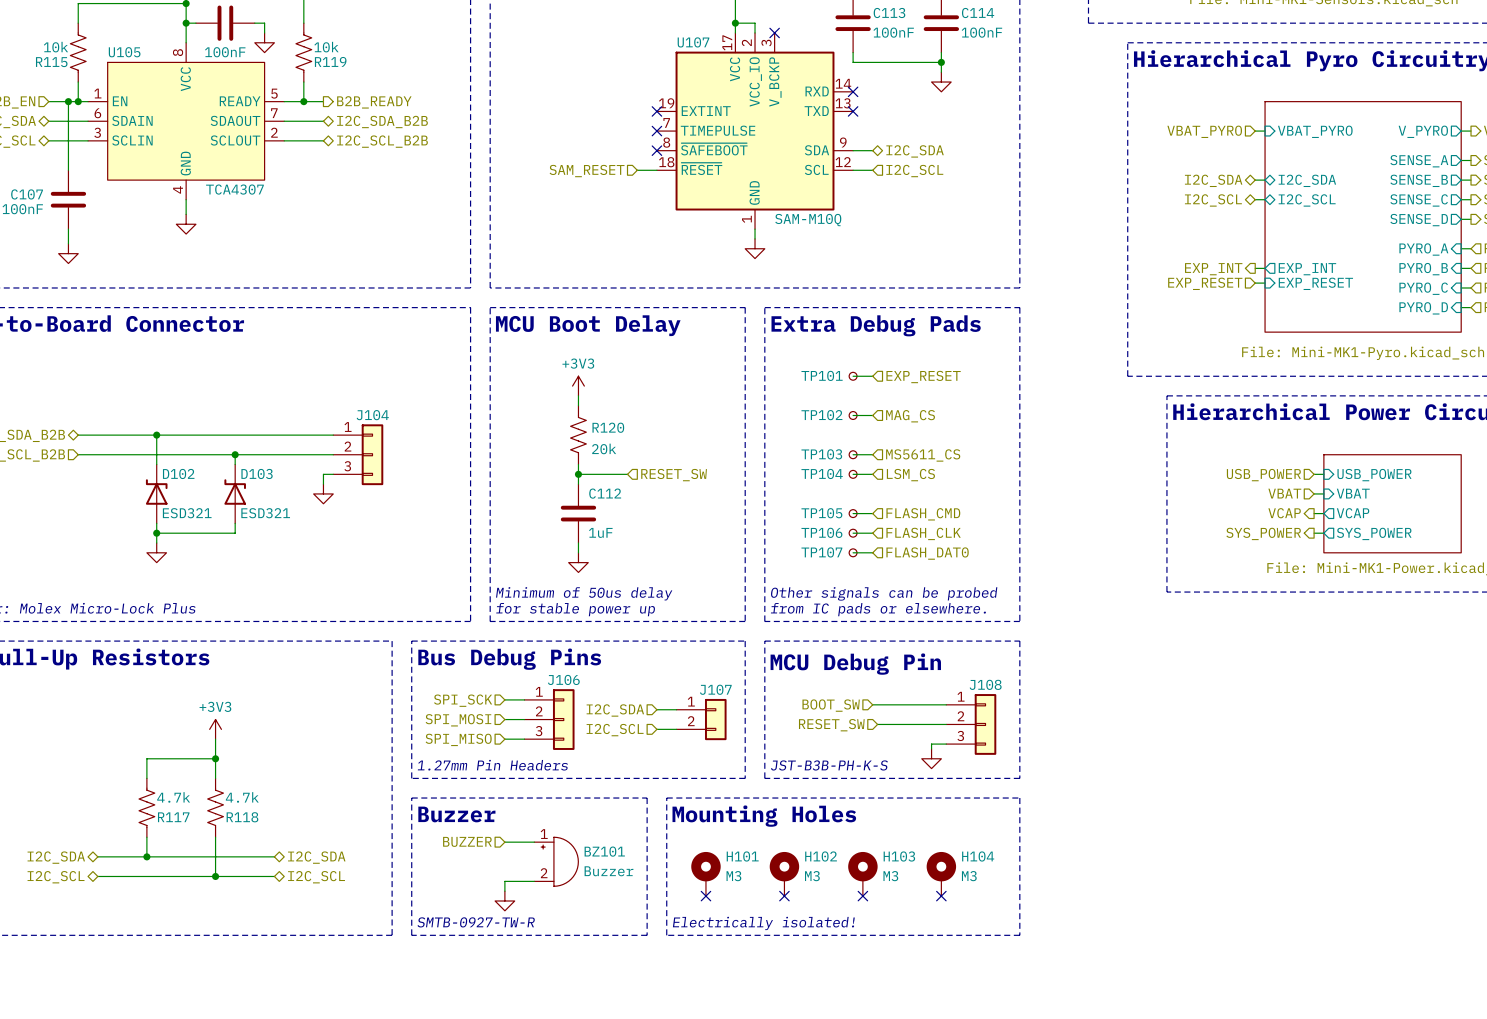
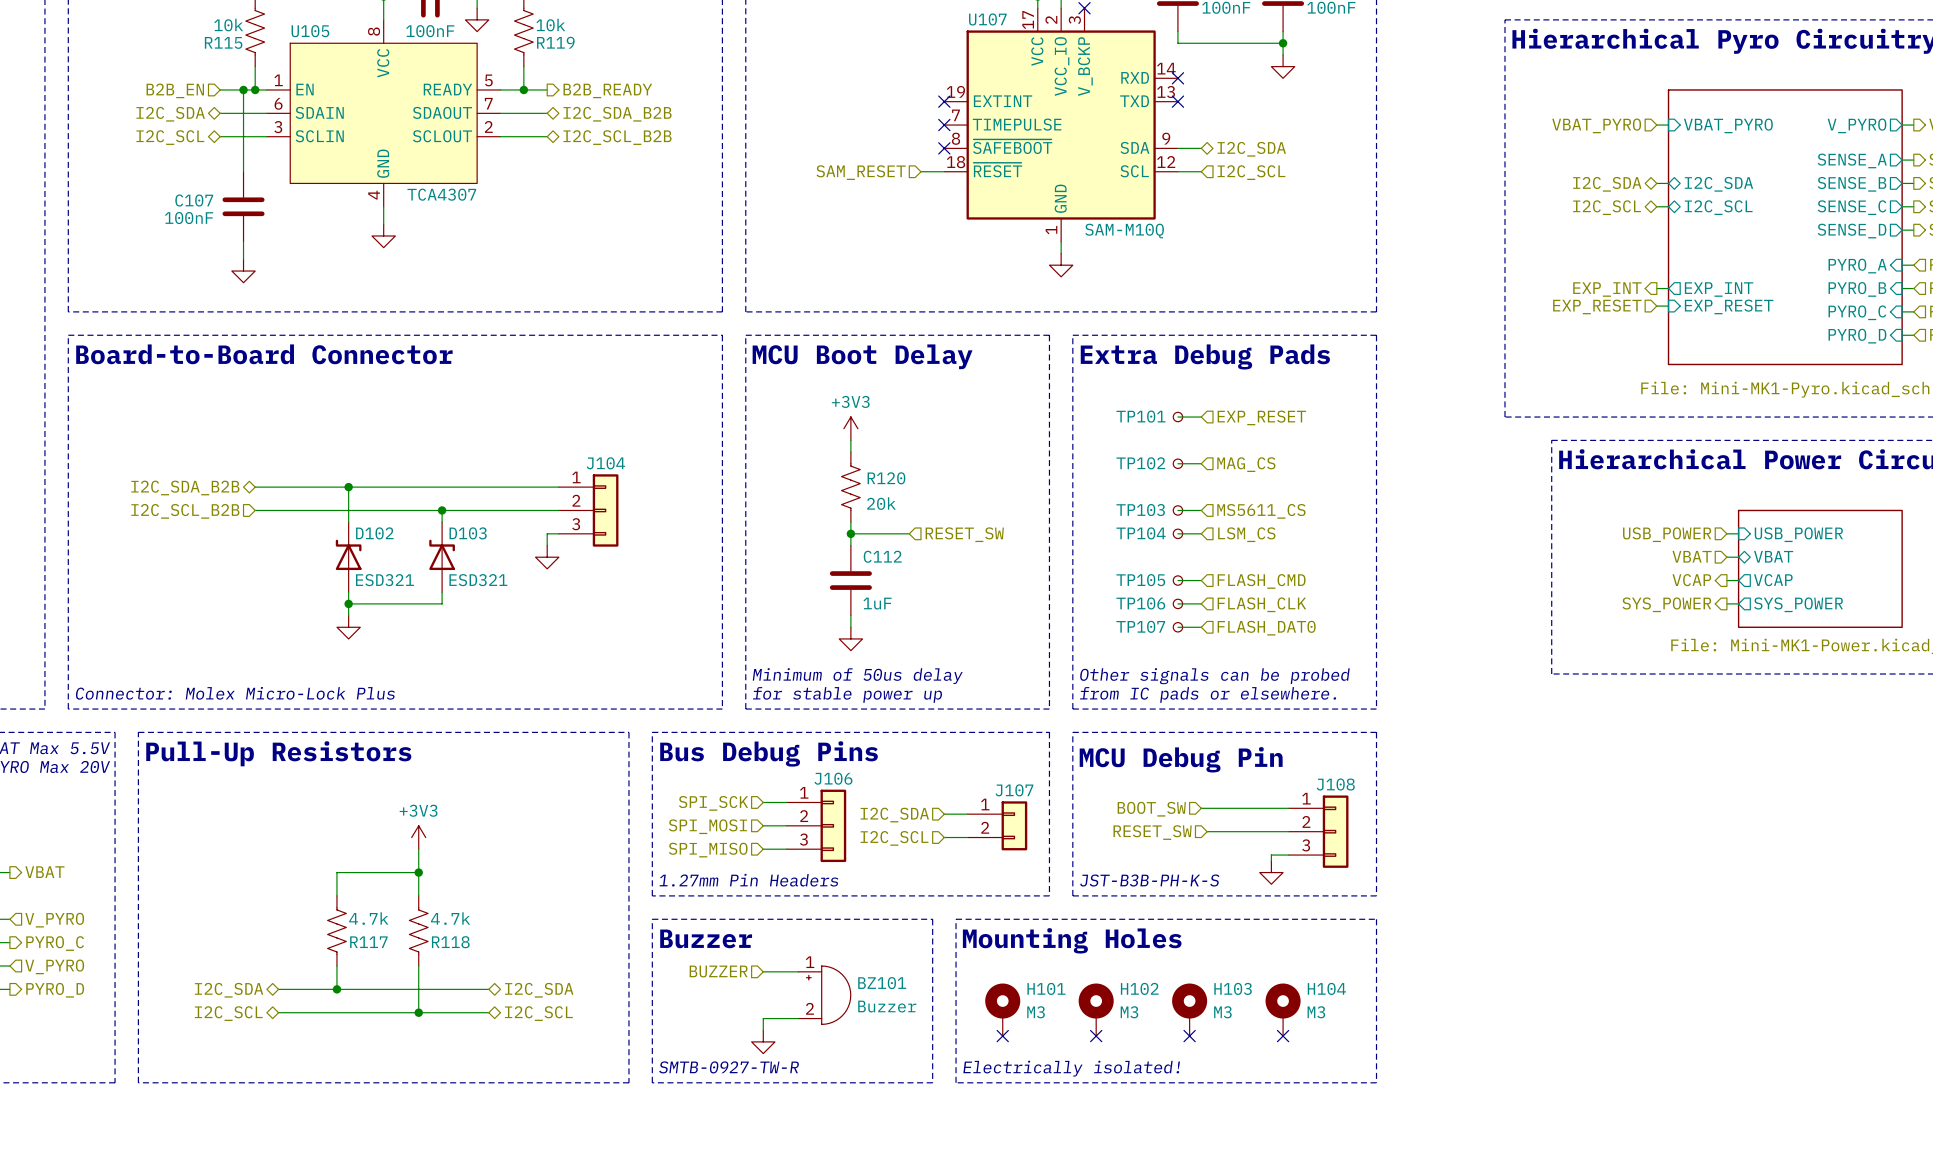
sheet pin shape: input (1353, 493) -> bidirectional (1773, 556)

